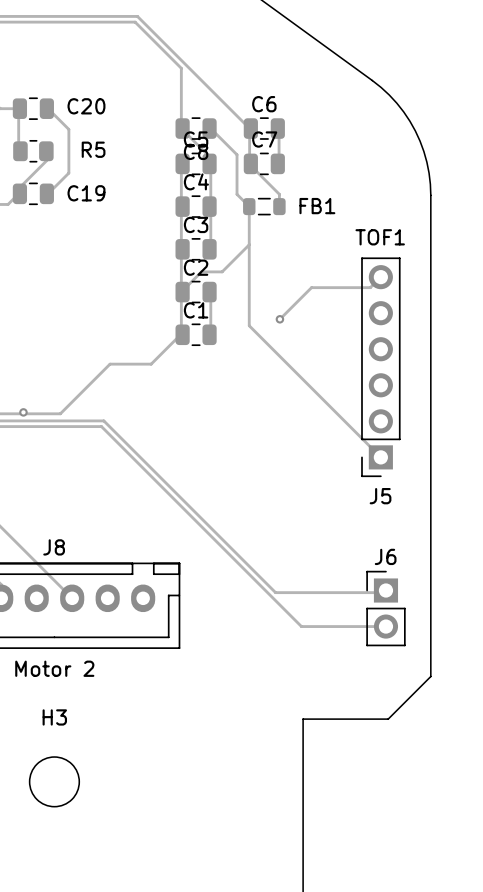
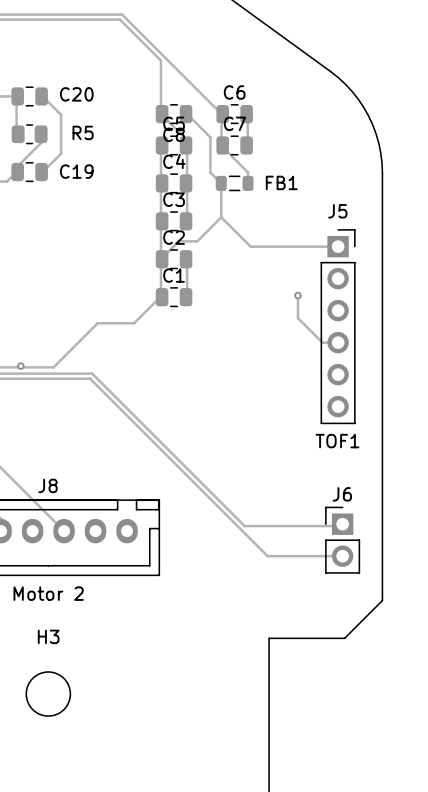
track: (249, 244) (249, 325) (380, 457) -> (221, 217) (250, 246) (338, 246)
track: (380, 277) (370, 287) (311, 287) (279, 319) -> none
via position: (279, 319) -> (297, 295)
track: none -> (297, 295) (297, 318) (322, 342) (338, 342)
J5 rotation: 0° (380, 367) -> 180° (338, 326)

